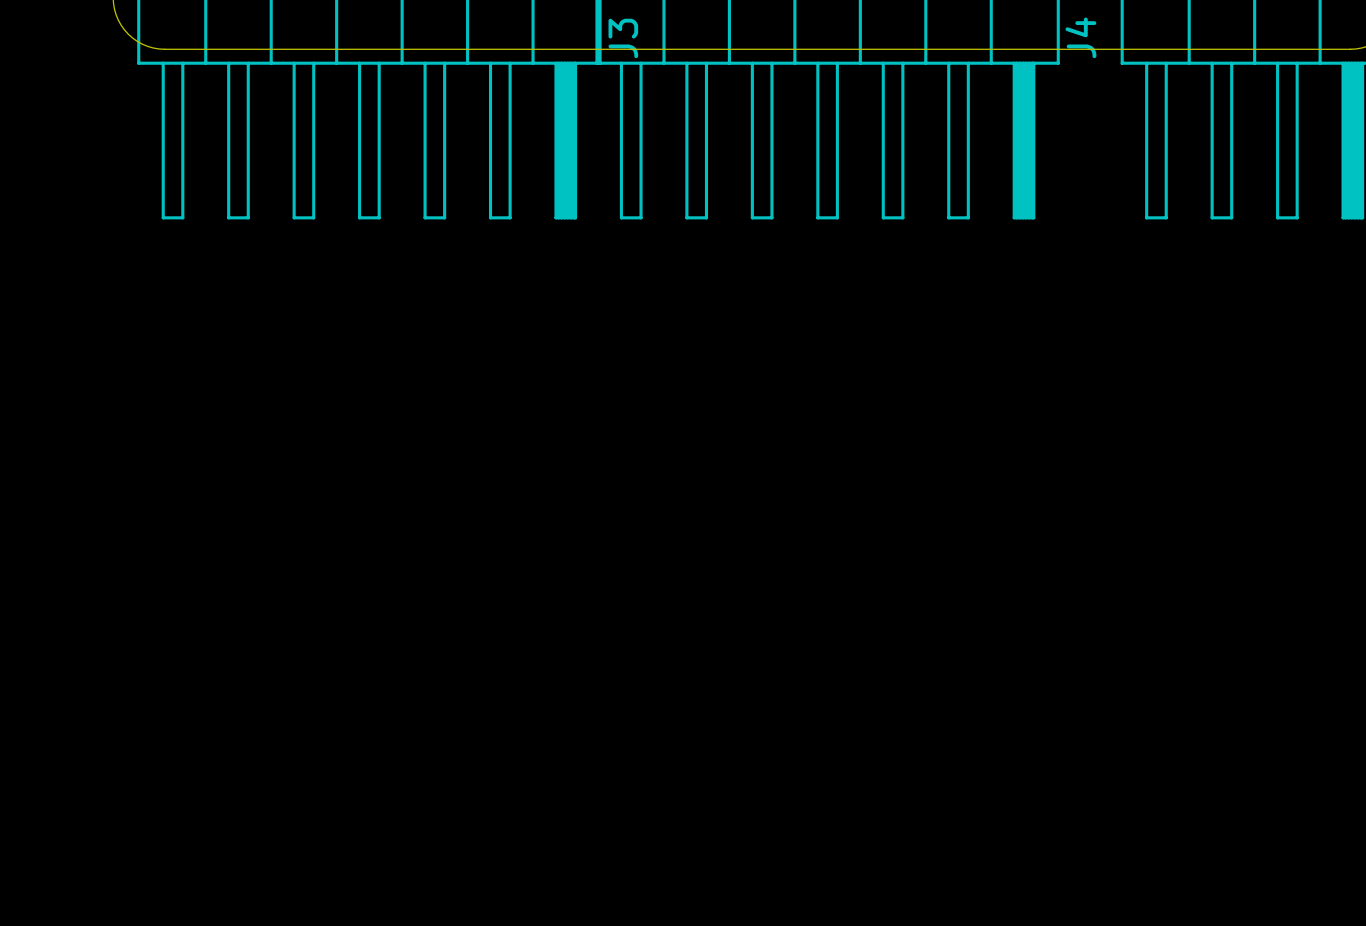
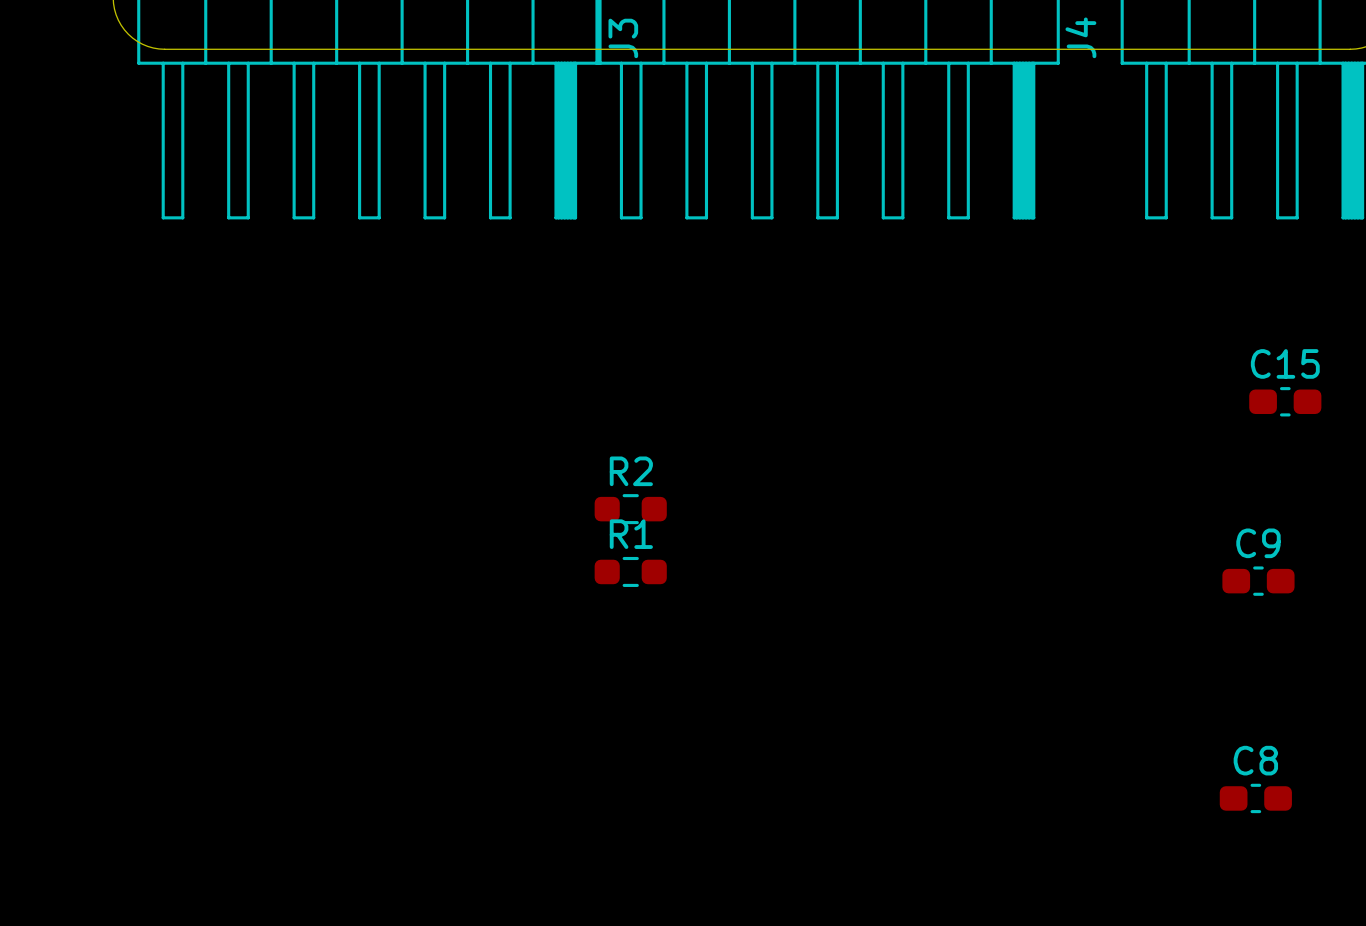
C15: none -> (1285, 401)
R2: none -> (630, 509)
R1: none -> (630, 571)
C9: none -> (1258, 581)
C8: none -> (1255, 798)

